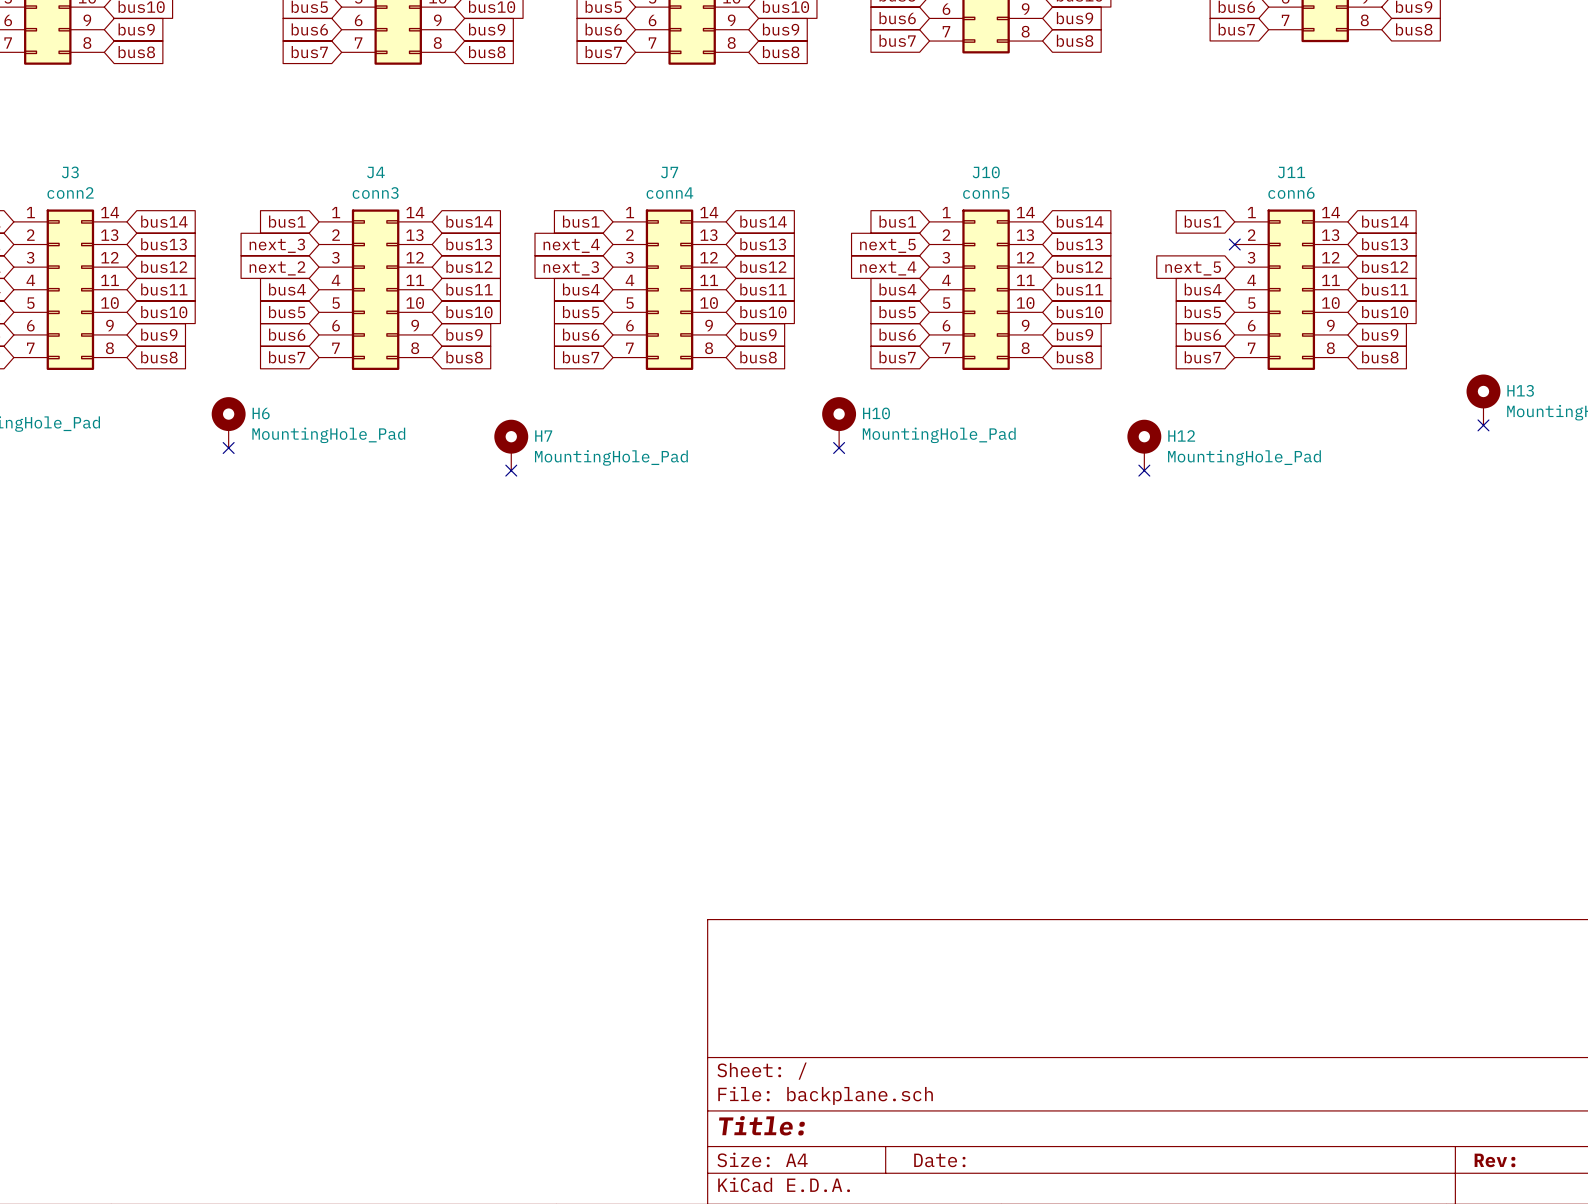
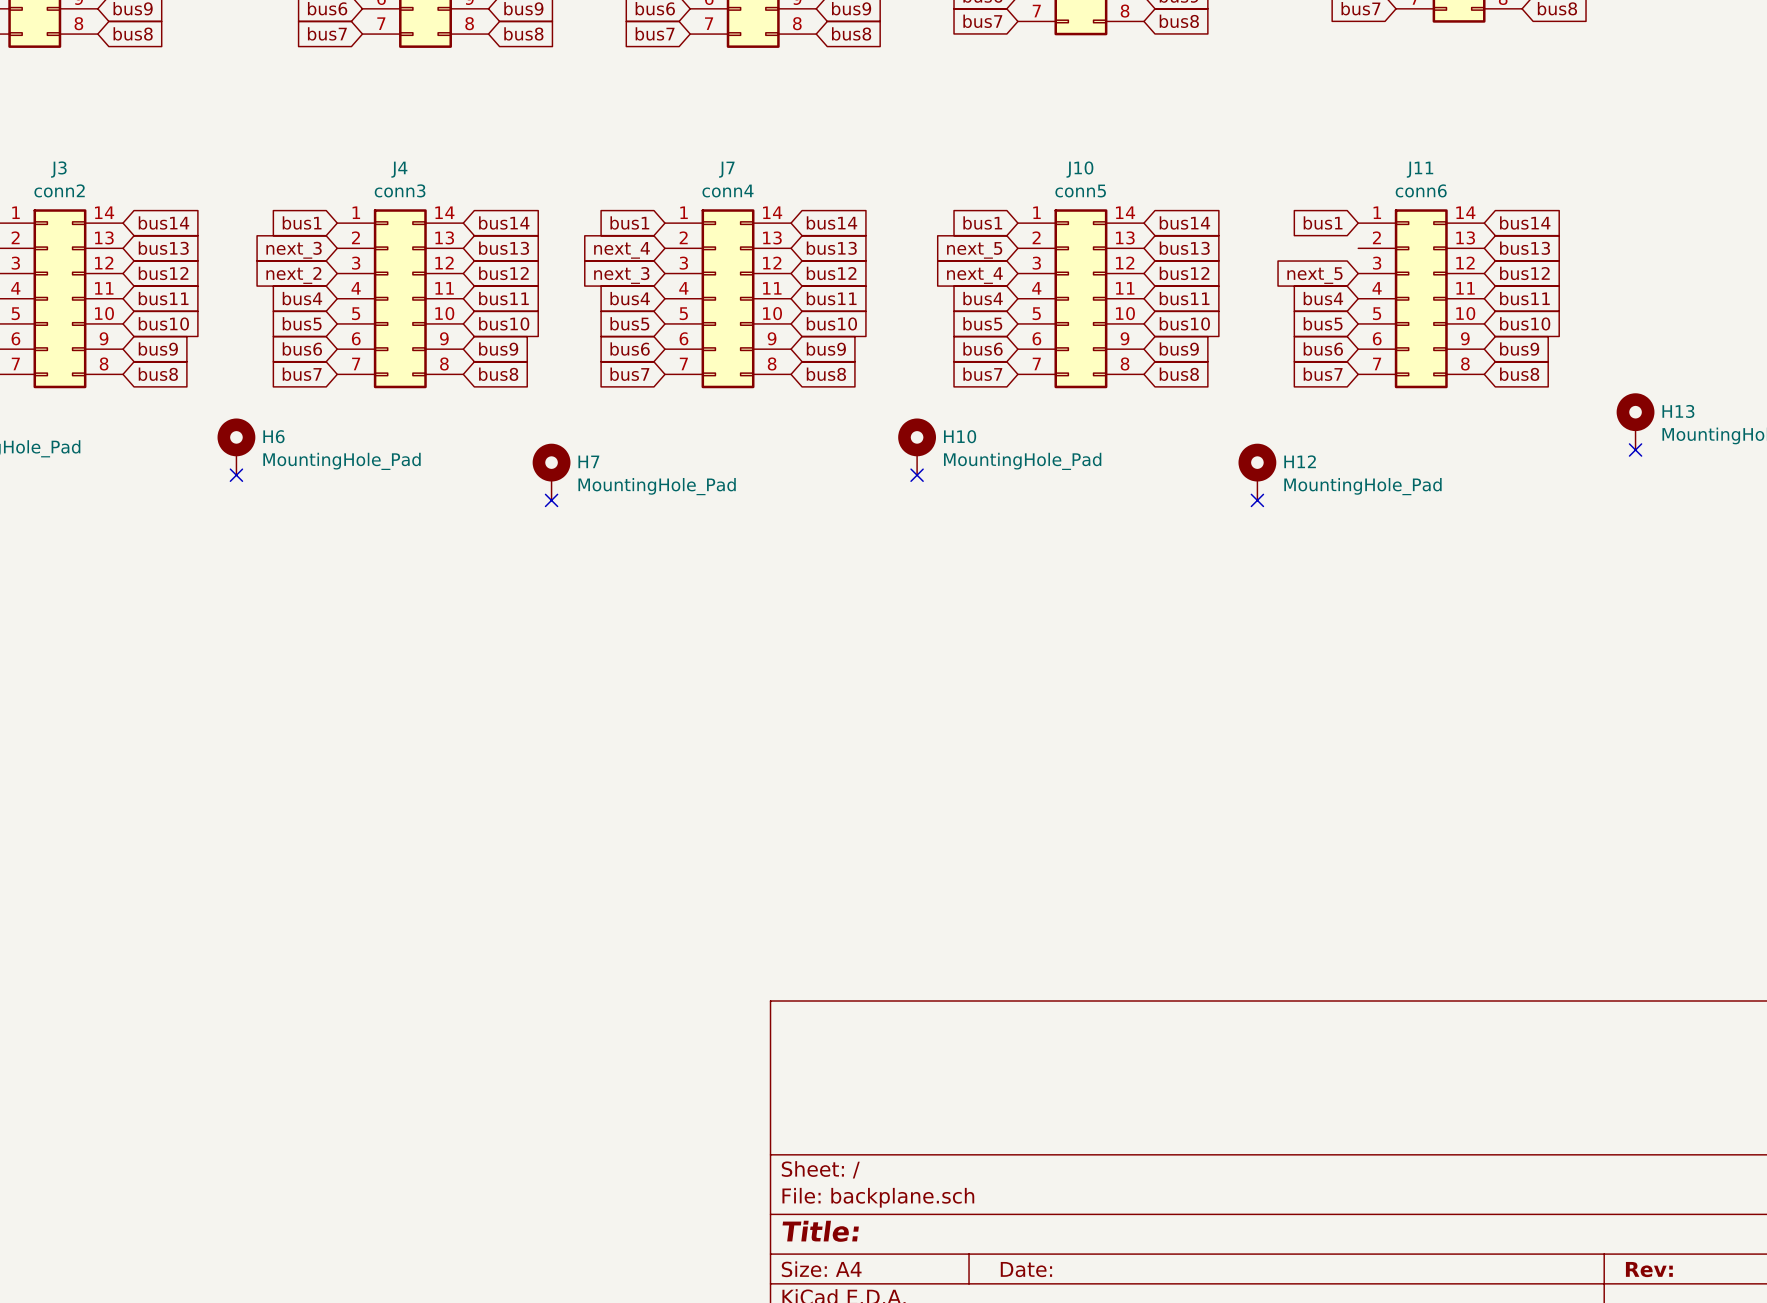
no-connect mark: (1234, 244) -> none

